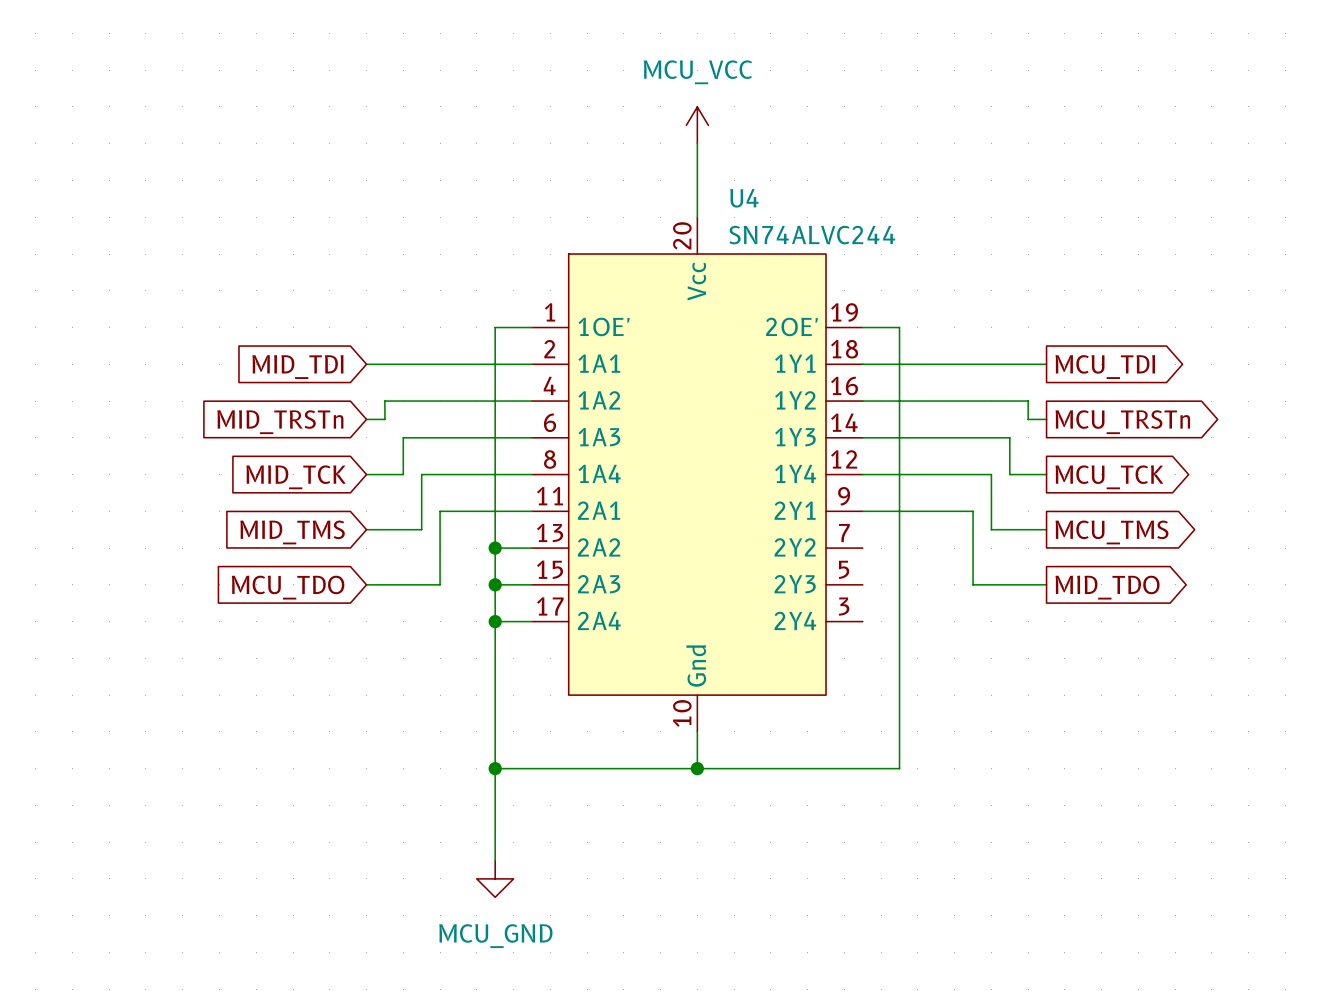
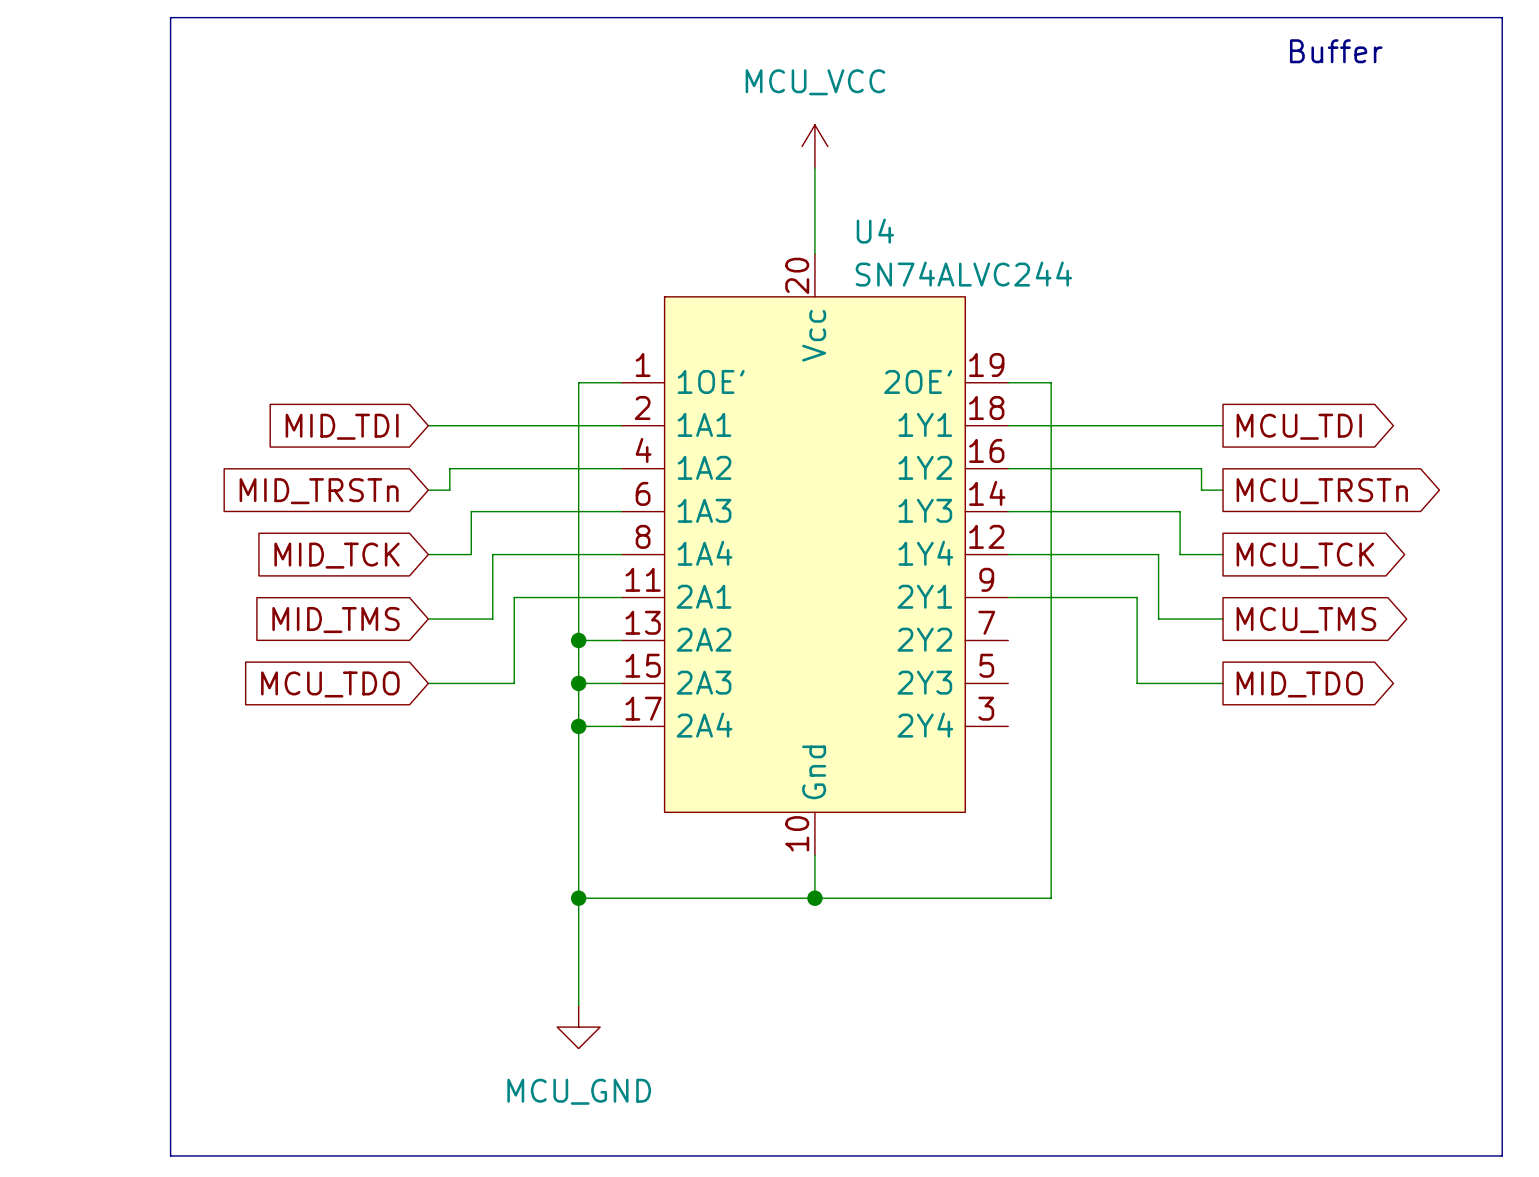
line: none -> (170, 17) (1502, 17) (1502, 1155) (170, 1155) (170, 17)
text: none -> Buffer (1336, 51)

